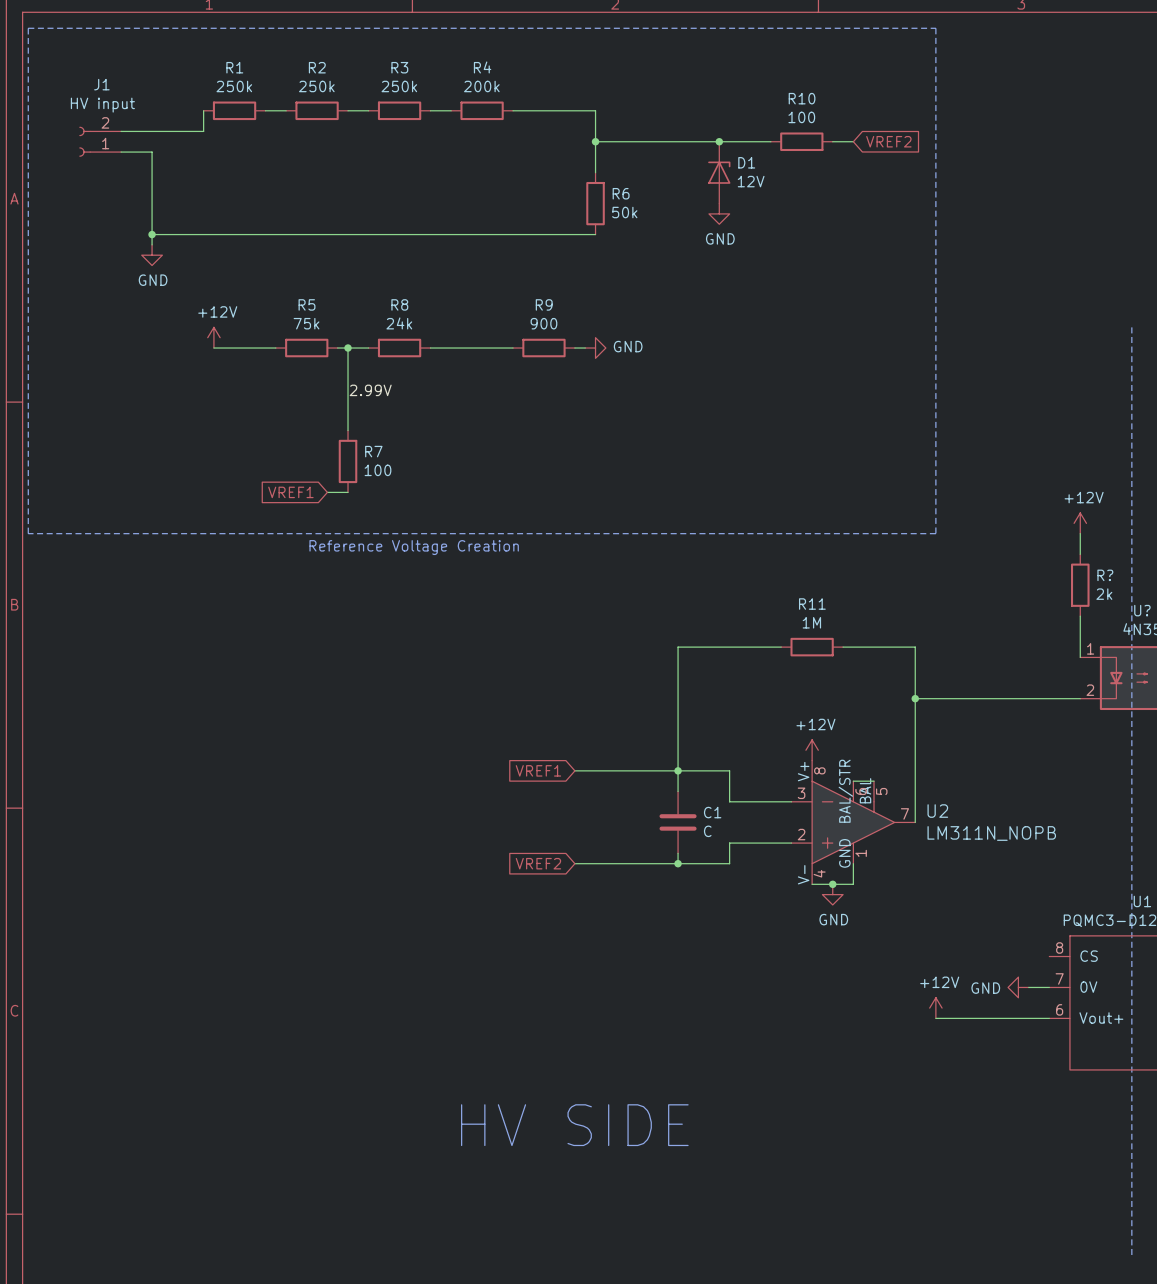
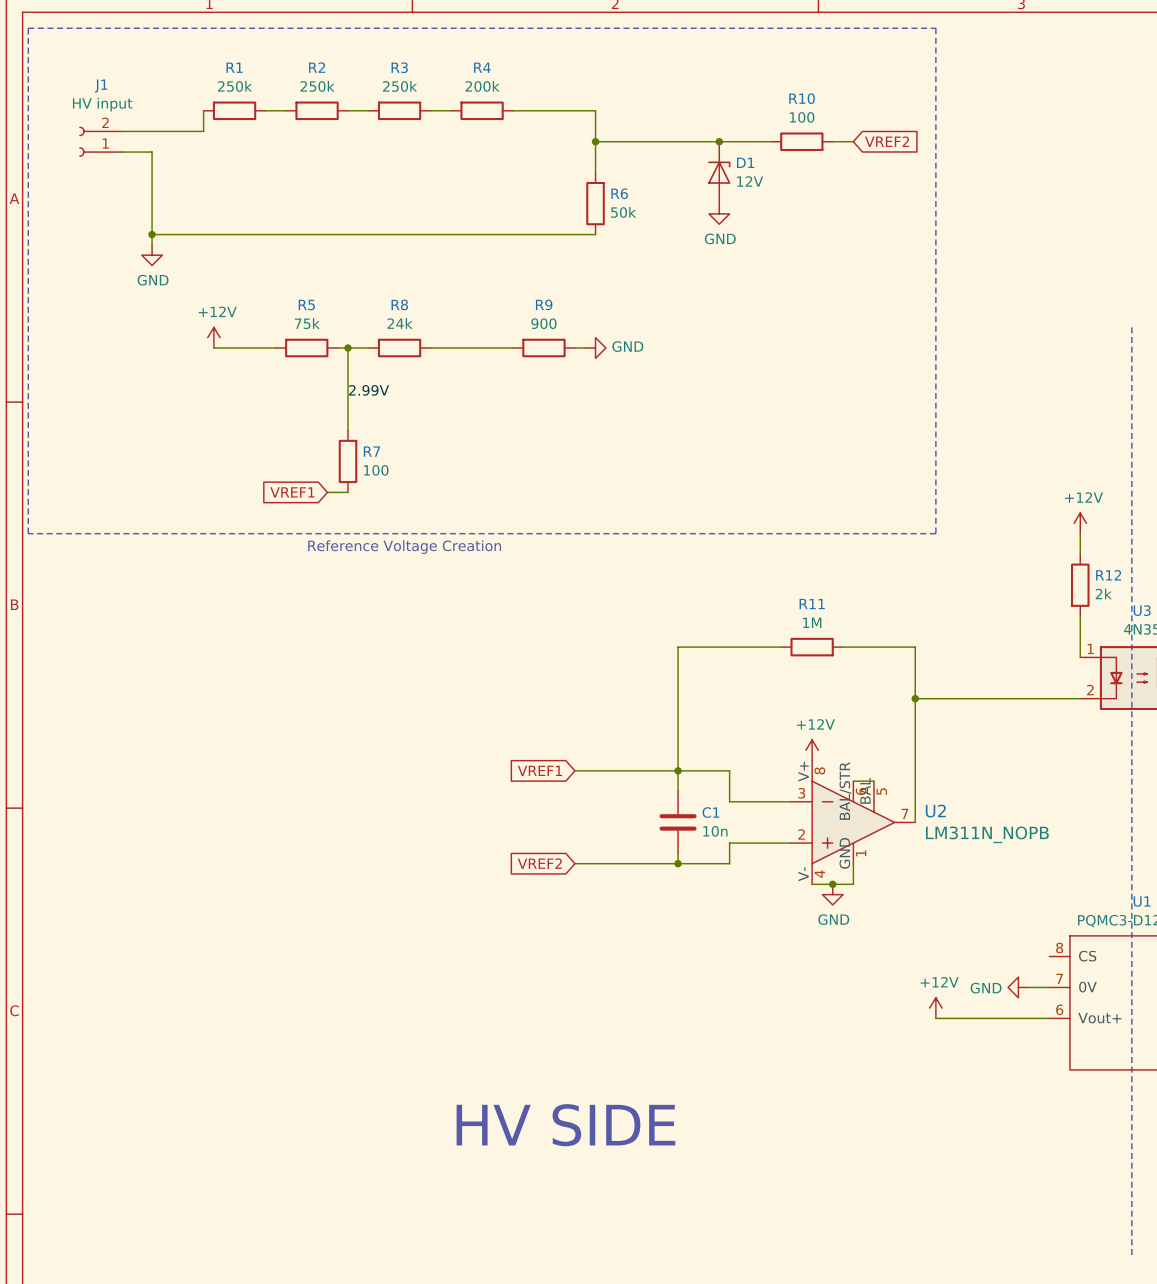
R? name: R? (1105, 575) -> R12 (1108, 575)
U? name: U? (1142, 610) -> U3 (1142, 610)
C1 value: C (707, 831) -> 10n (715, 831)

